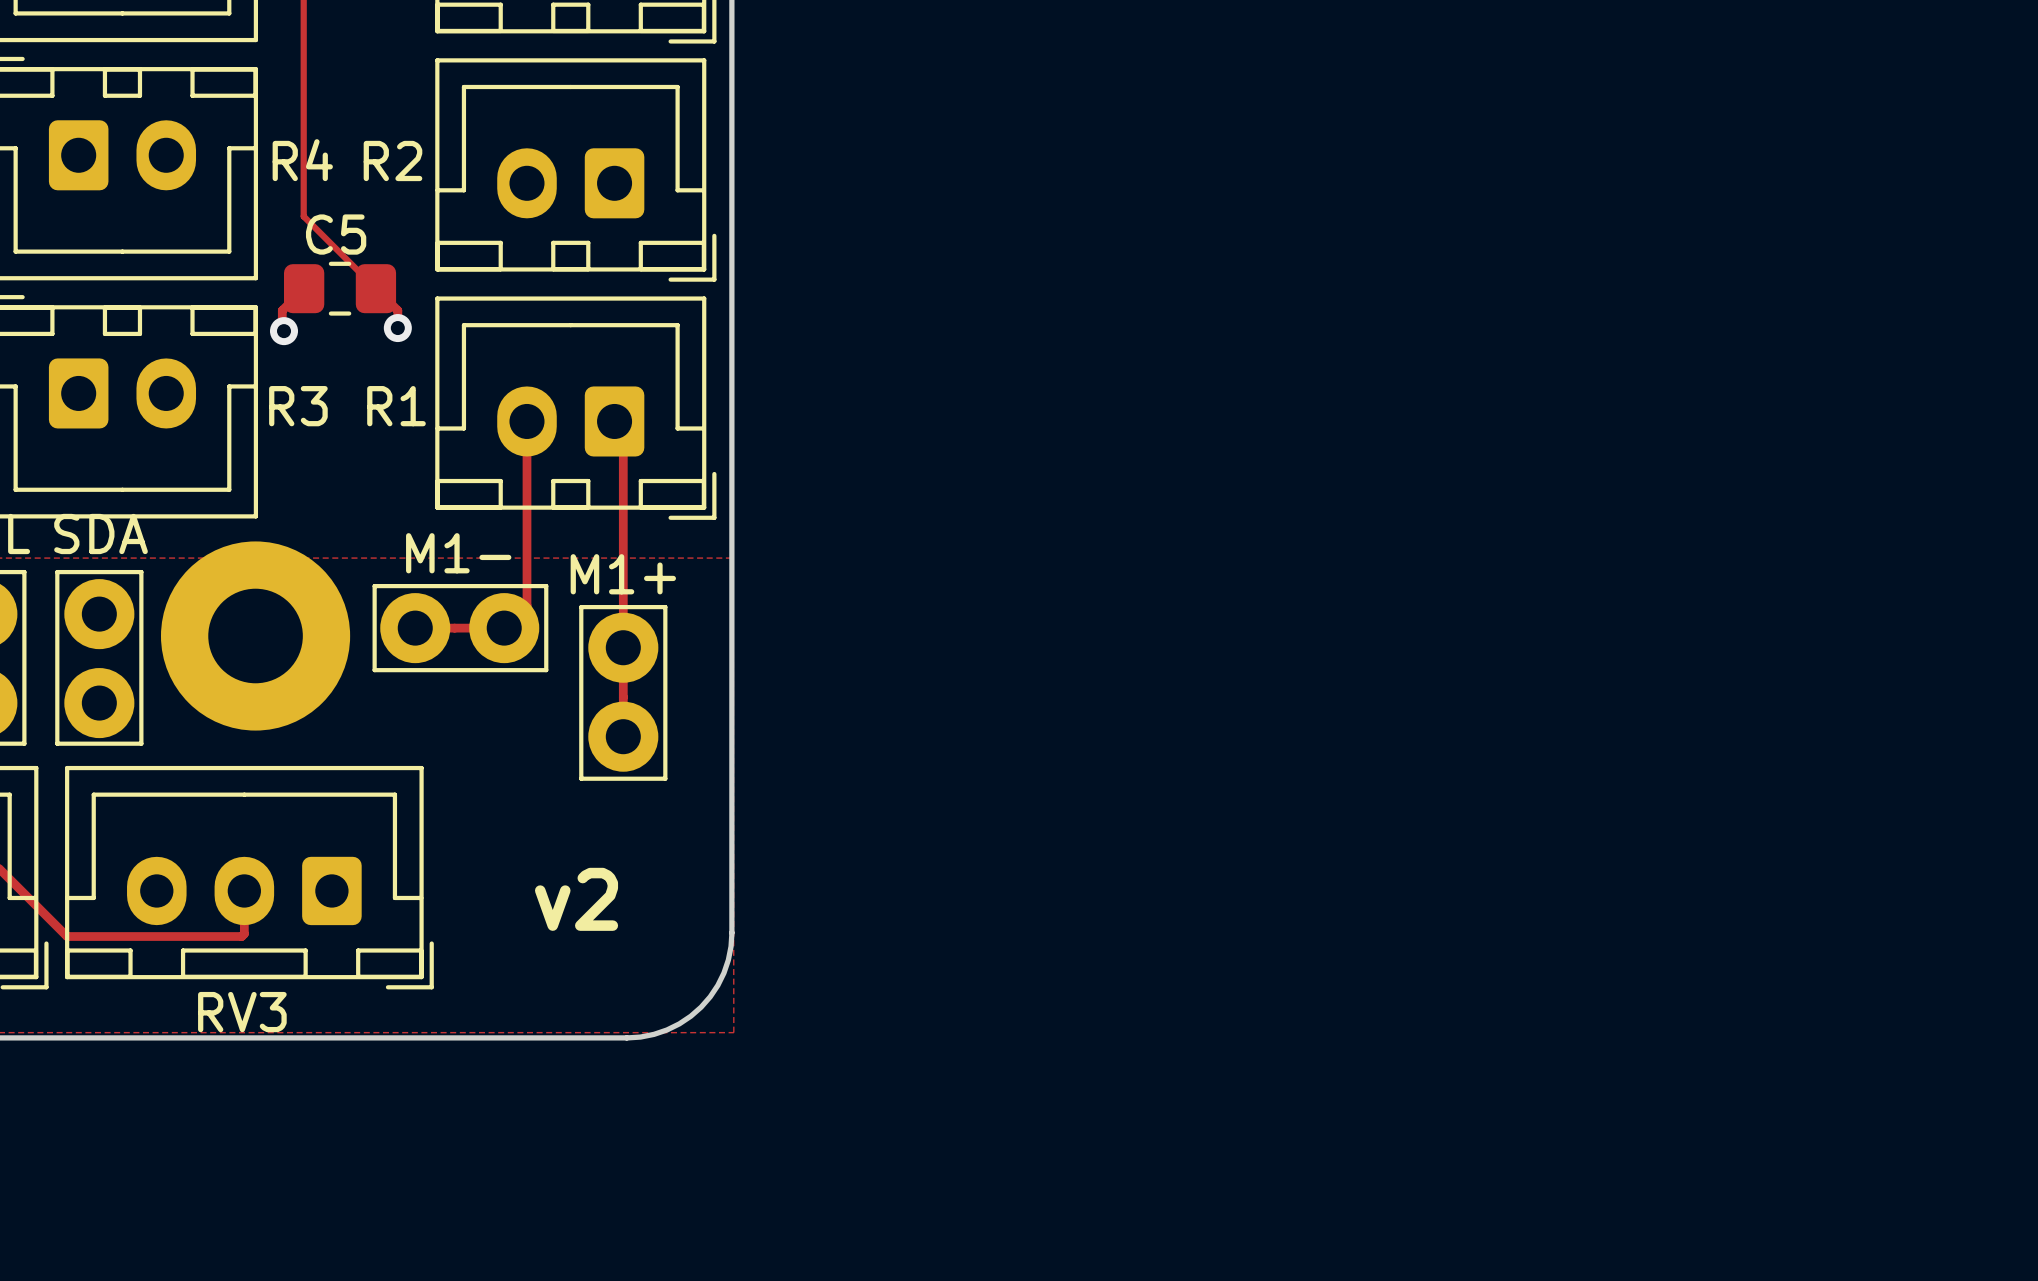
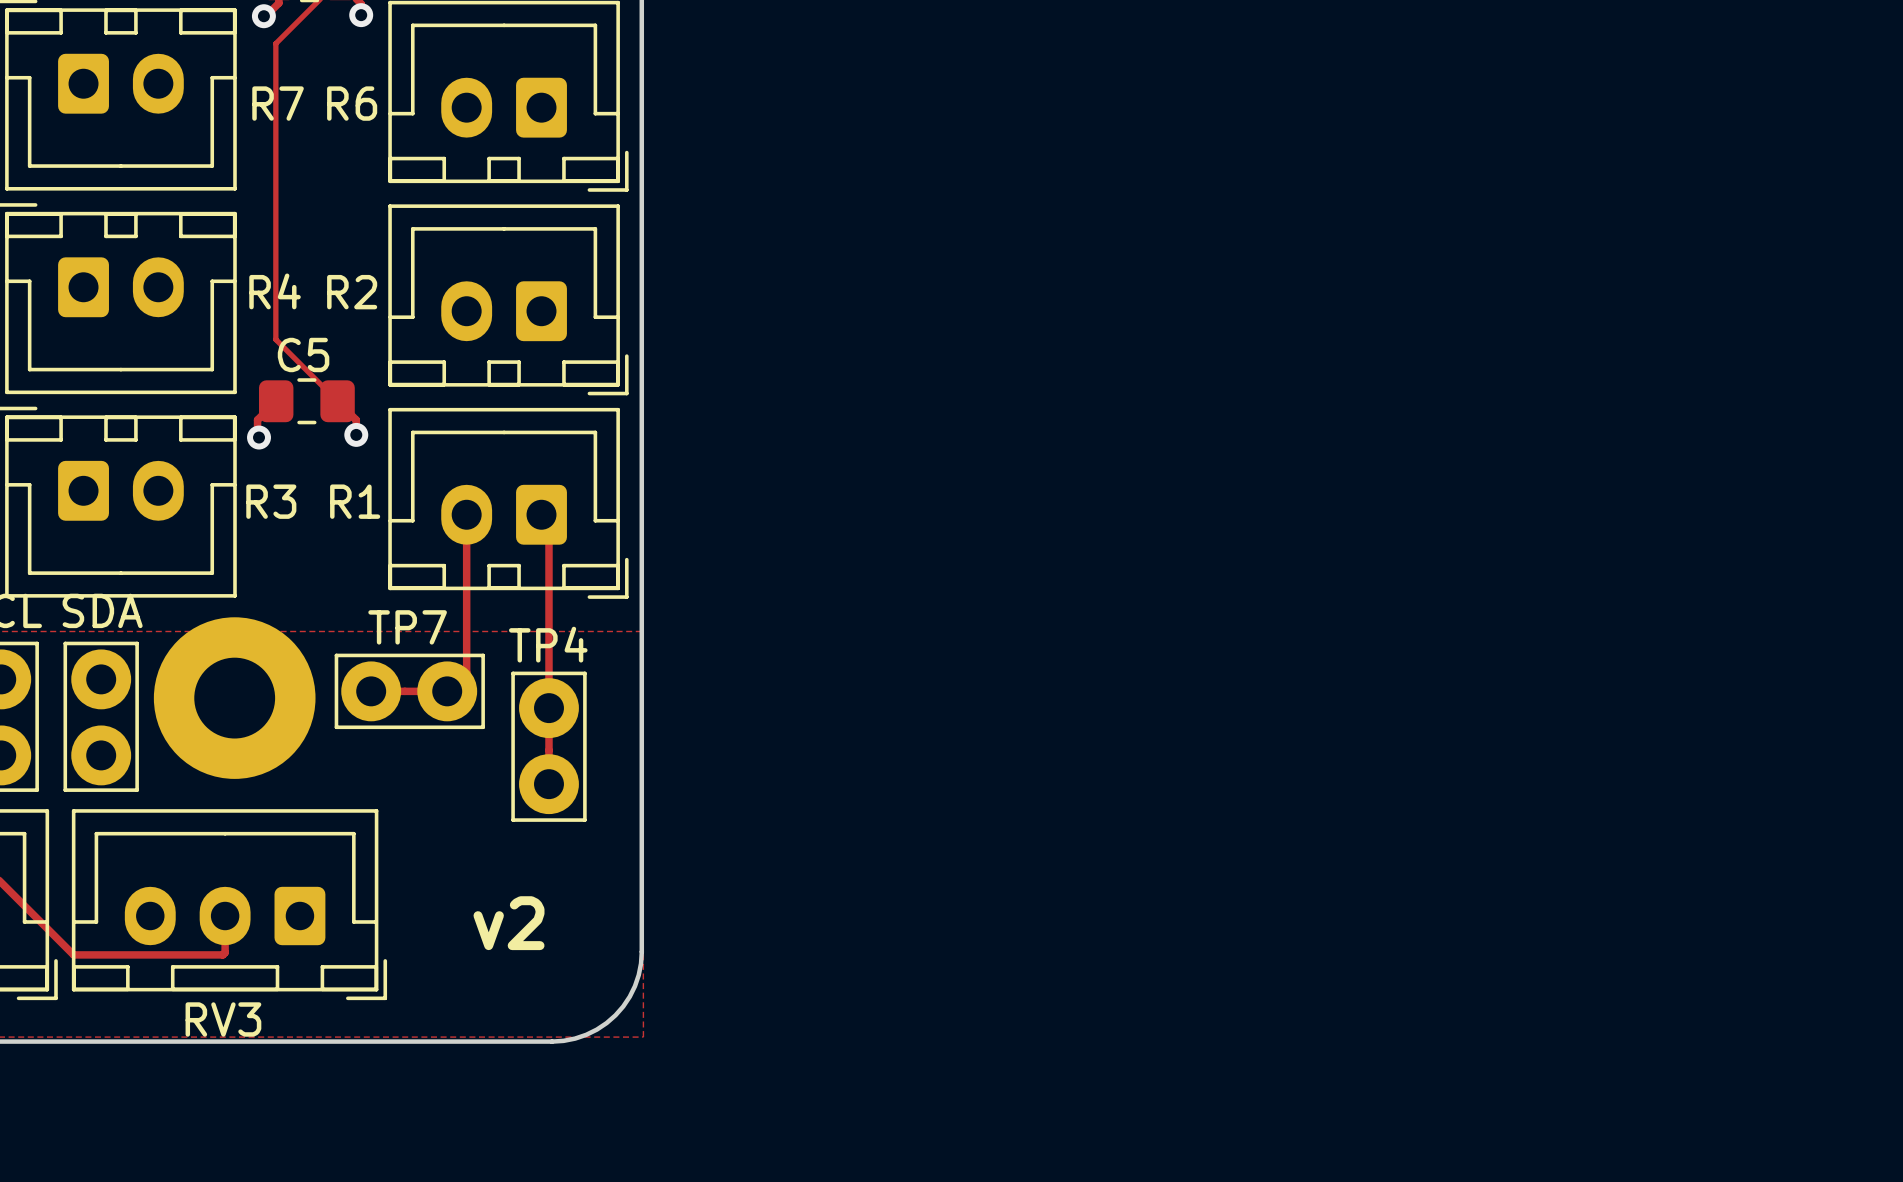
M1- name: M1- (458, 553) -> TP7 (407, 627)
M1+ name: M1+ (623, 574) -> TP4 (548, 644)

